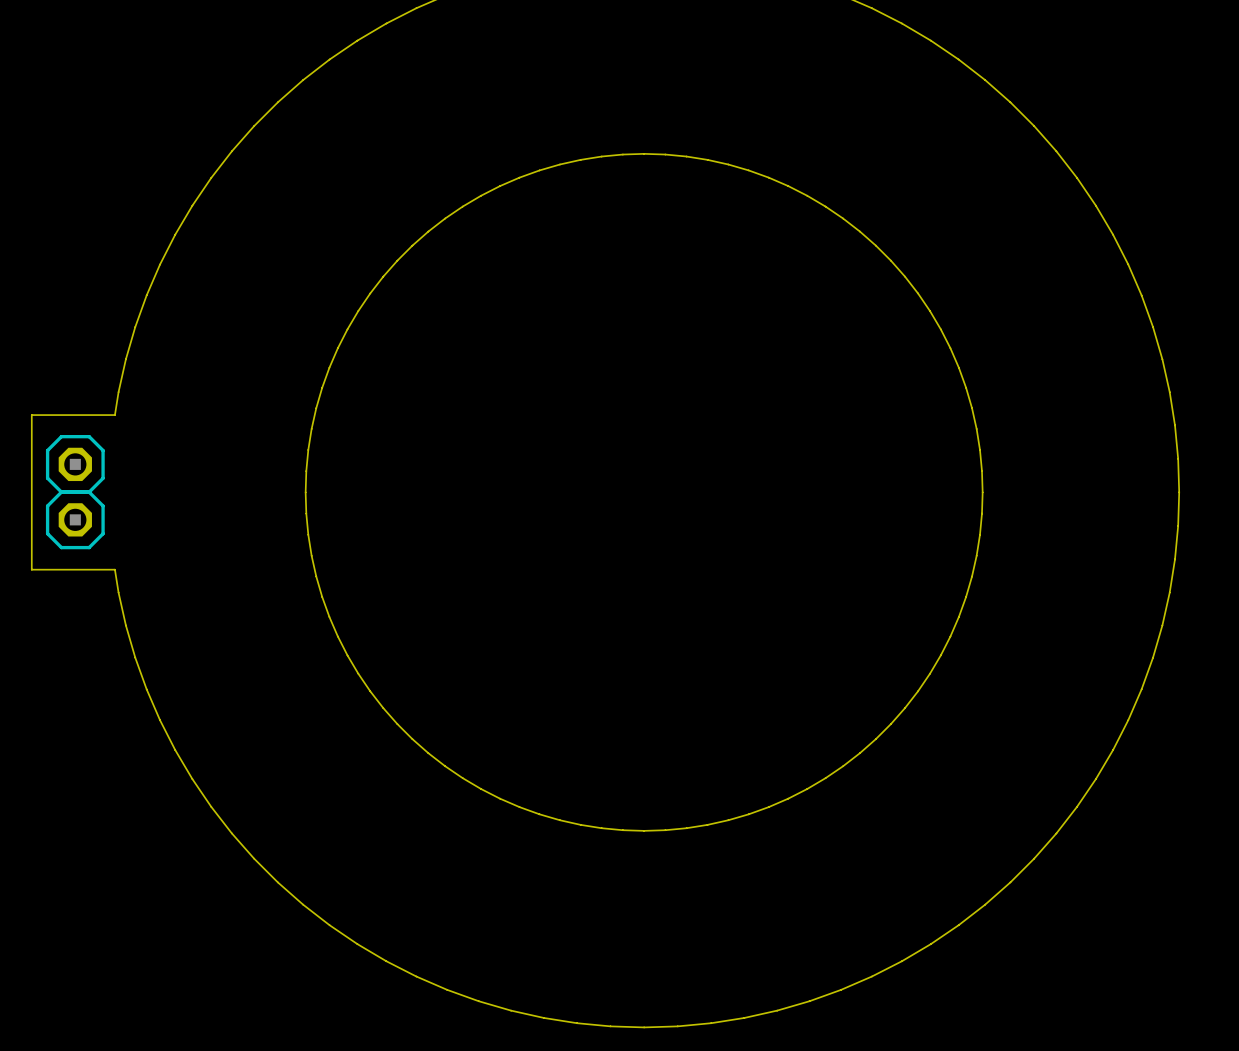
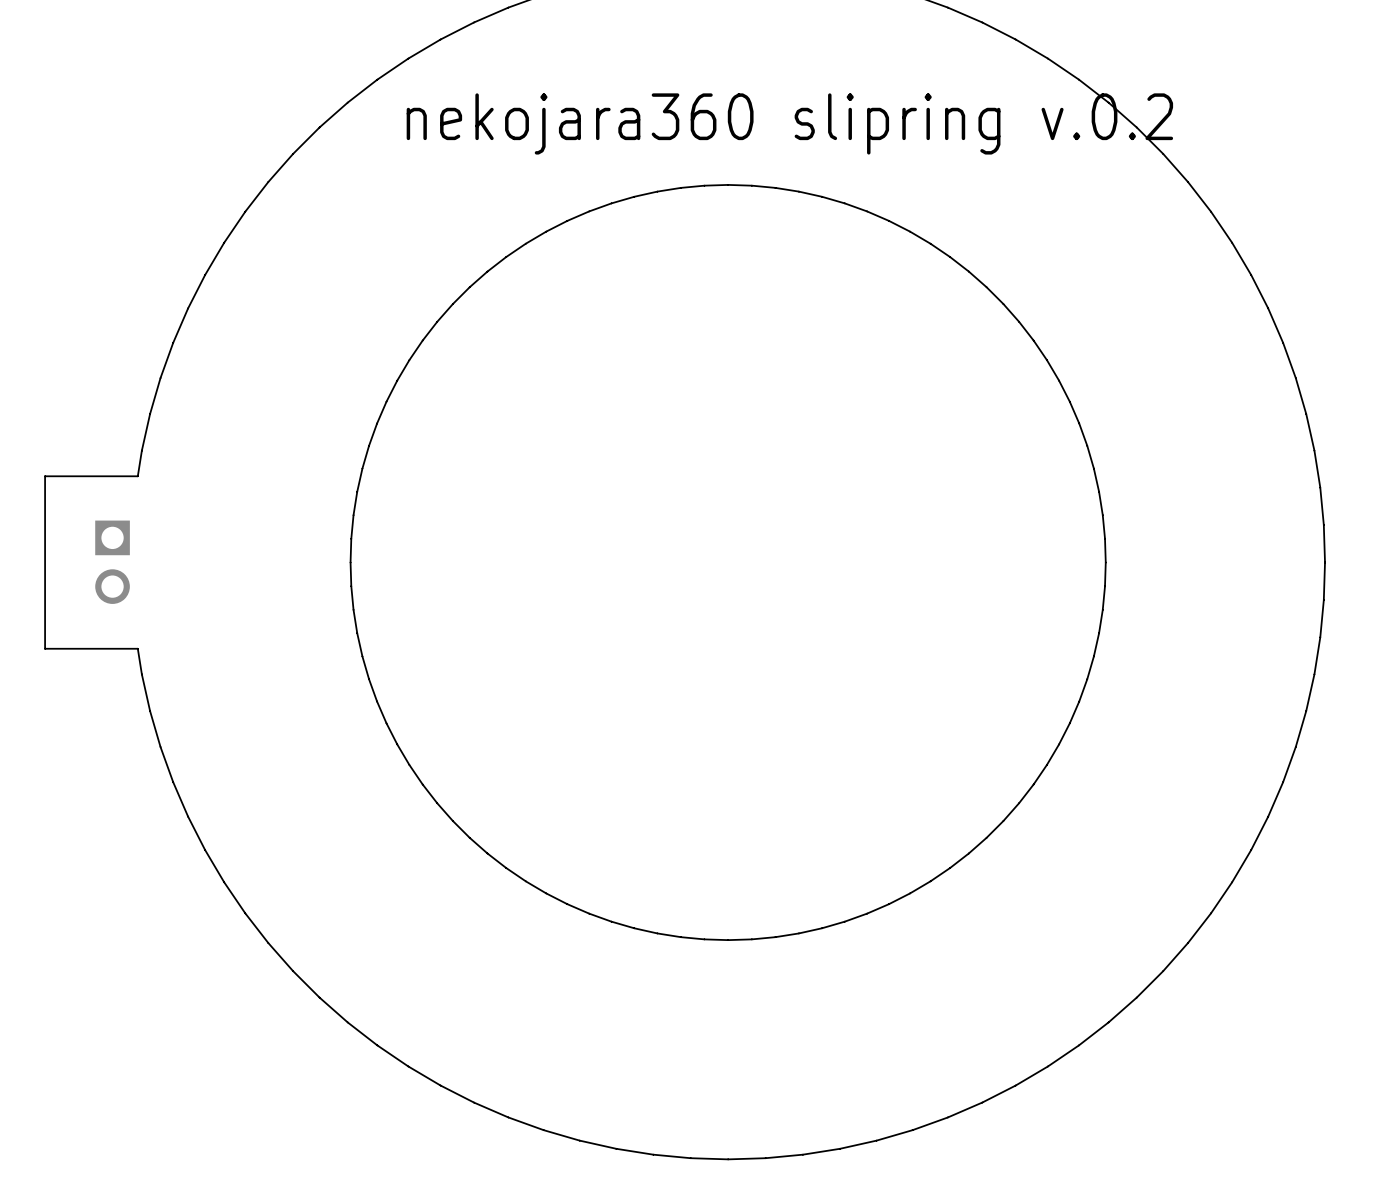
text: none -> nekojara360 slipring v.0.2 (789, 123)
part: (75, 464) -> none
part: none -> (112, 562)
part: (75, 519) -> none

